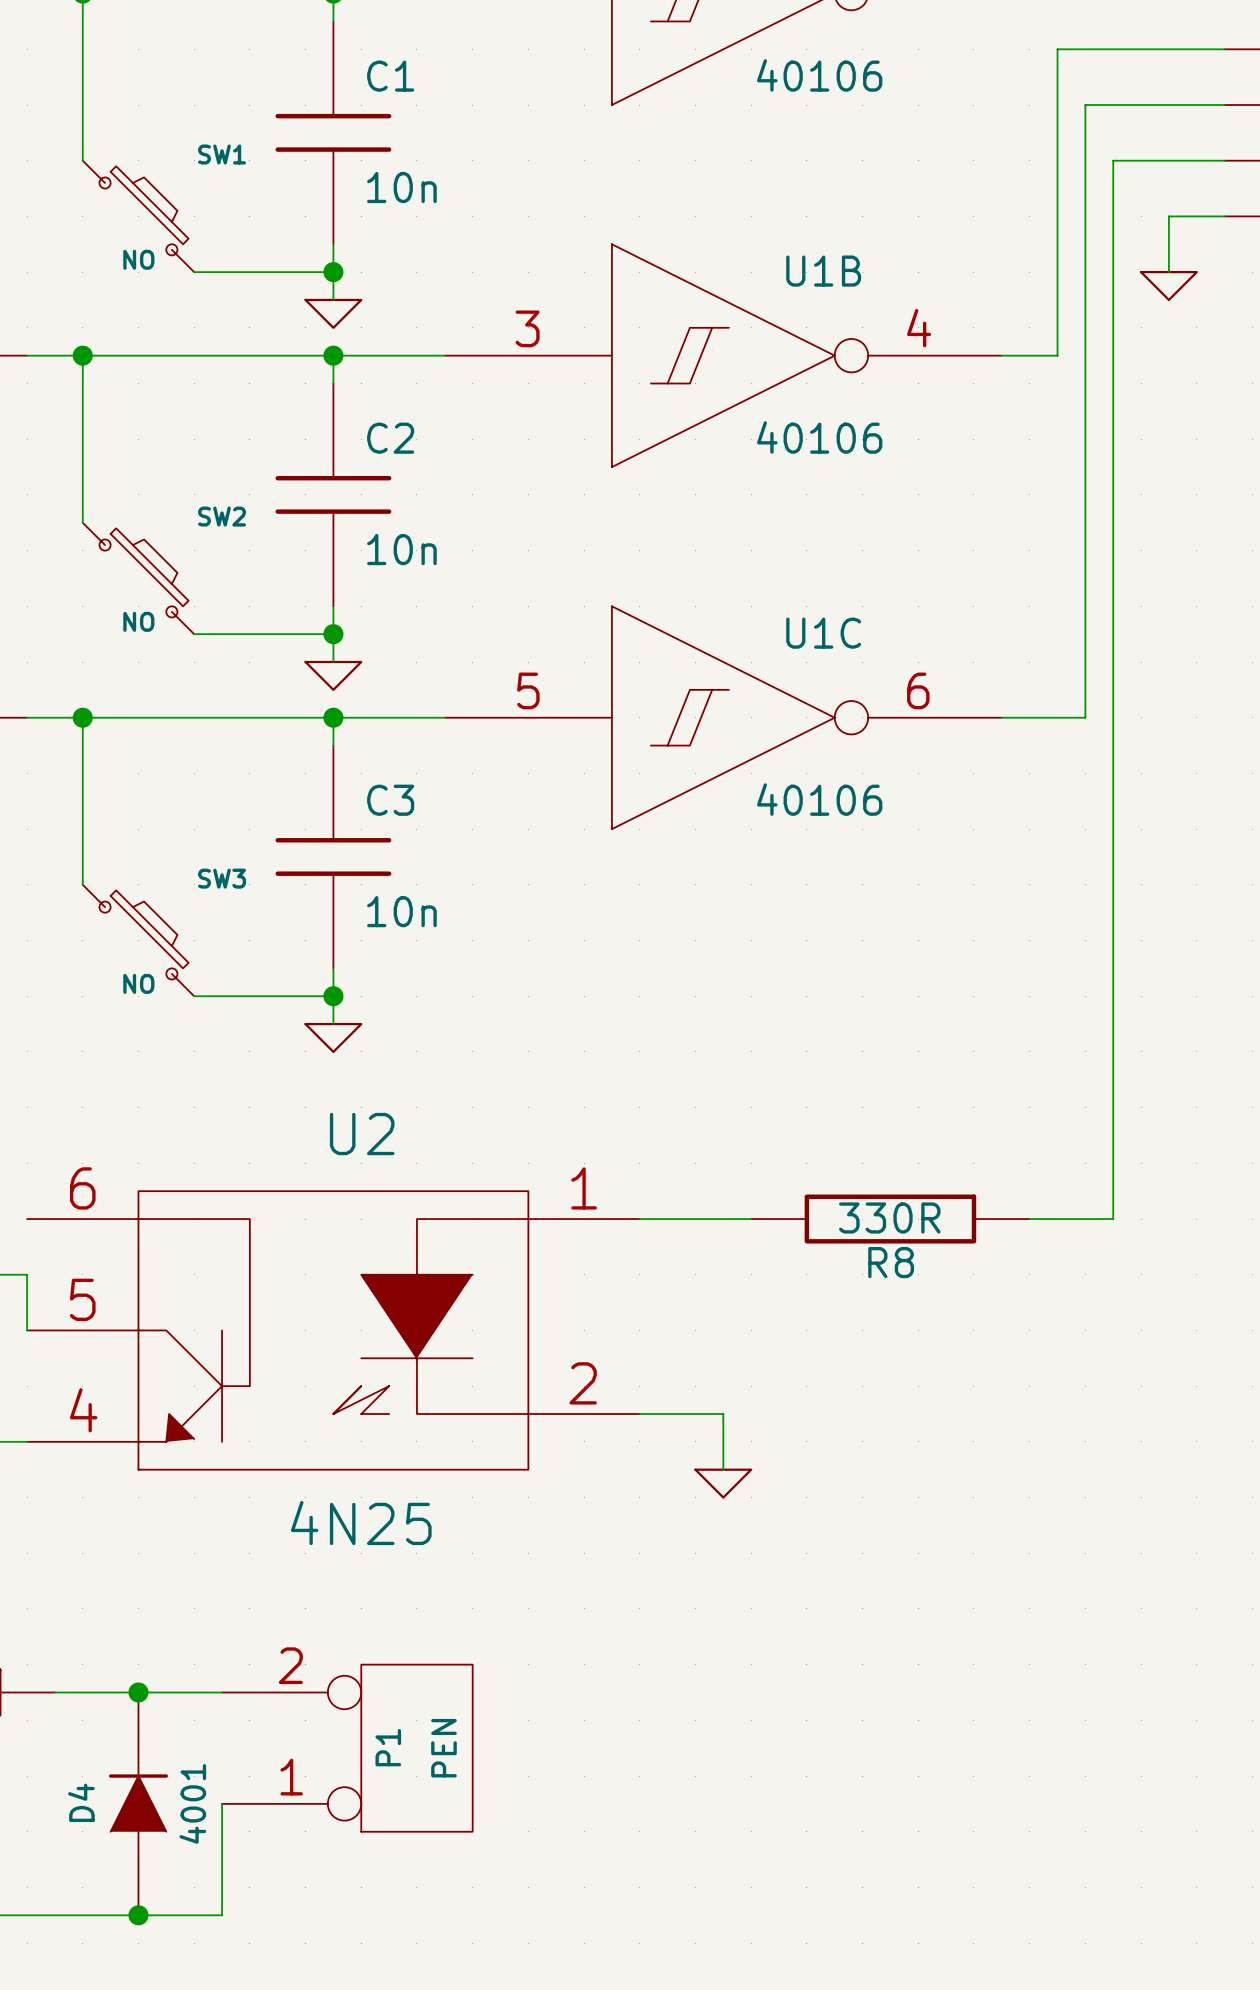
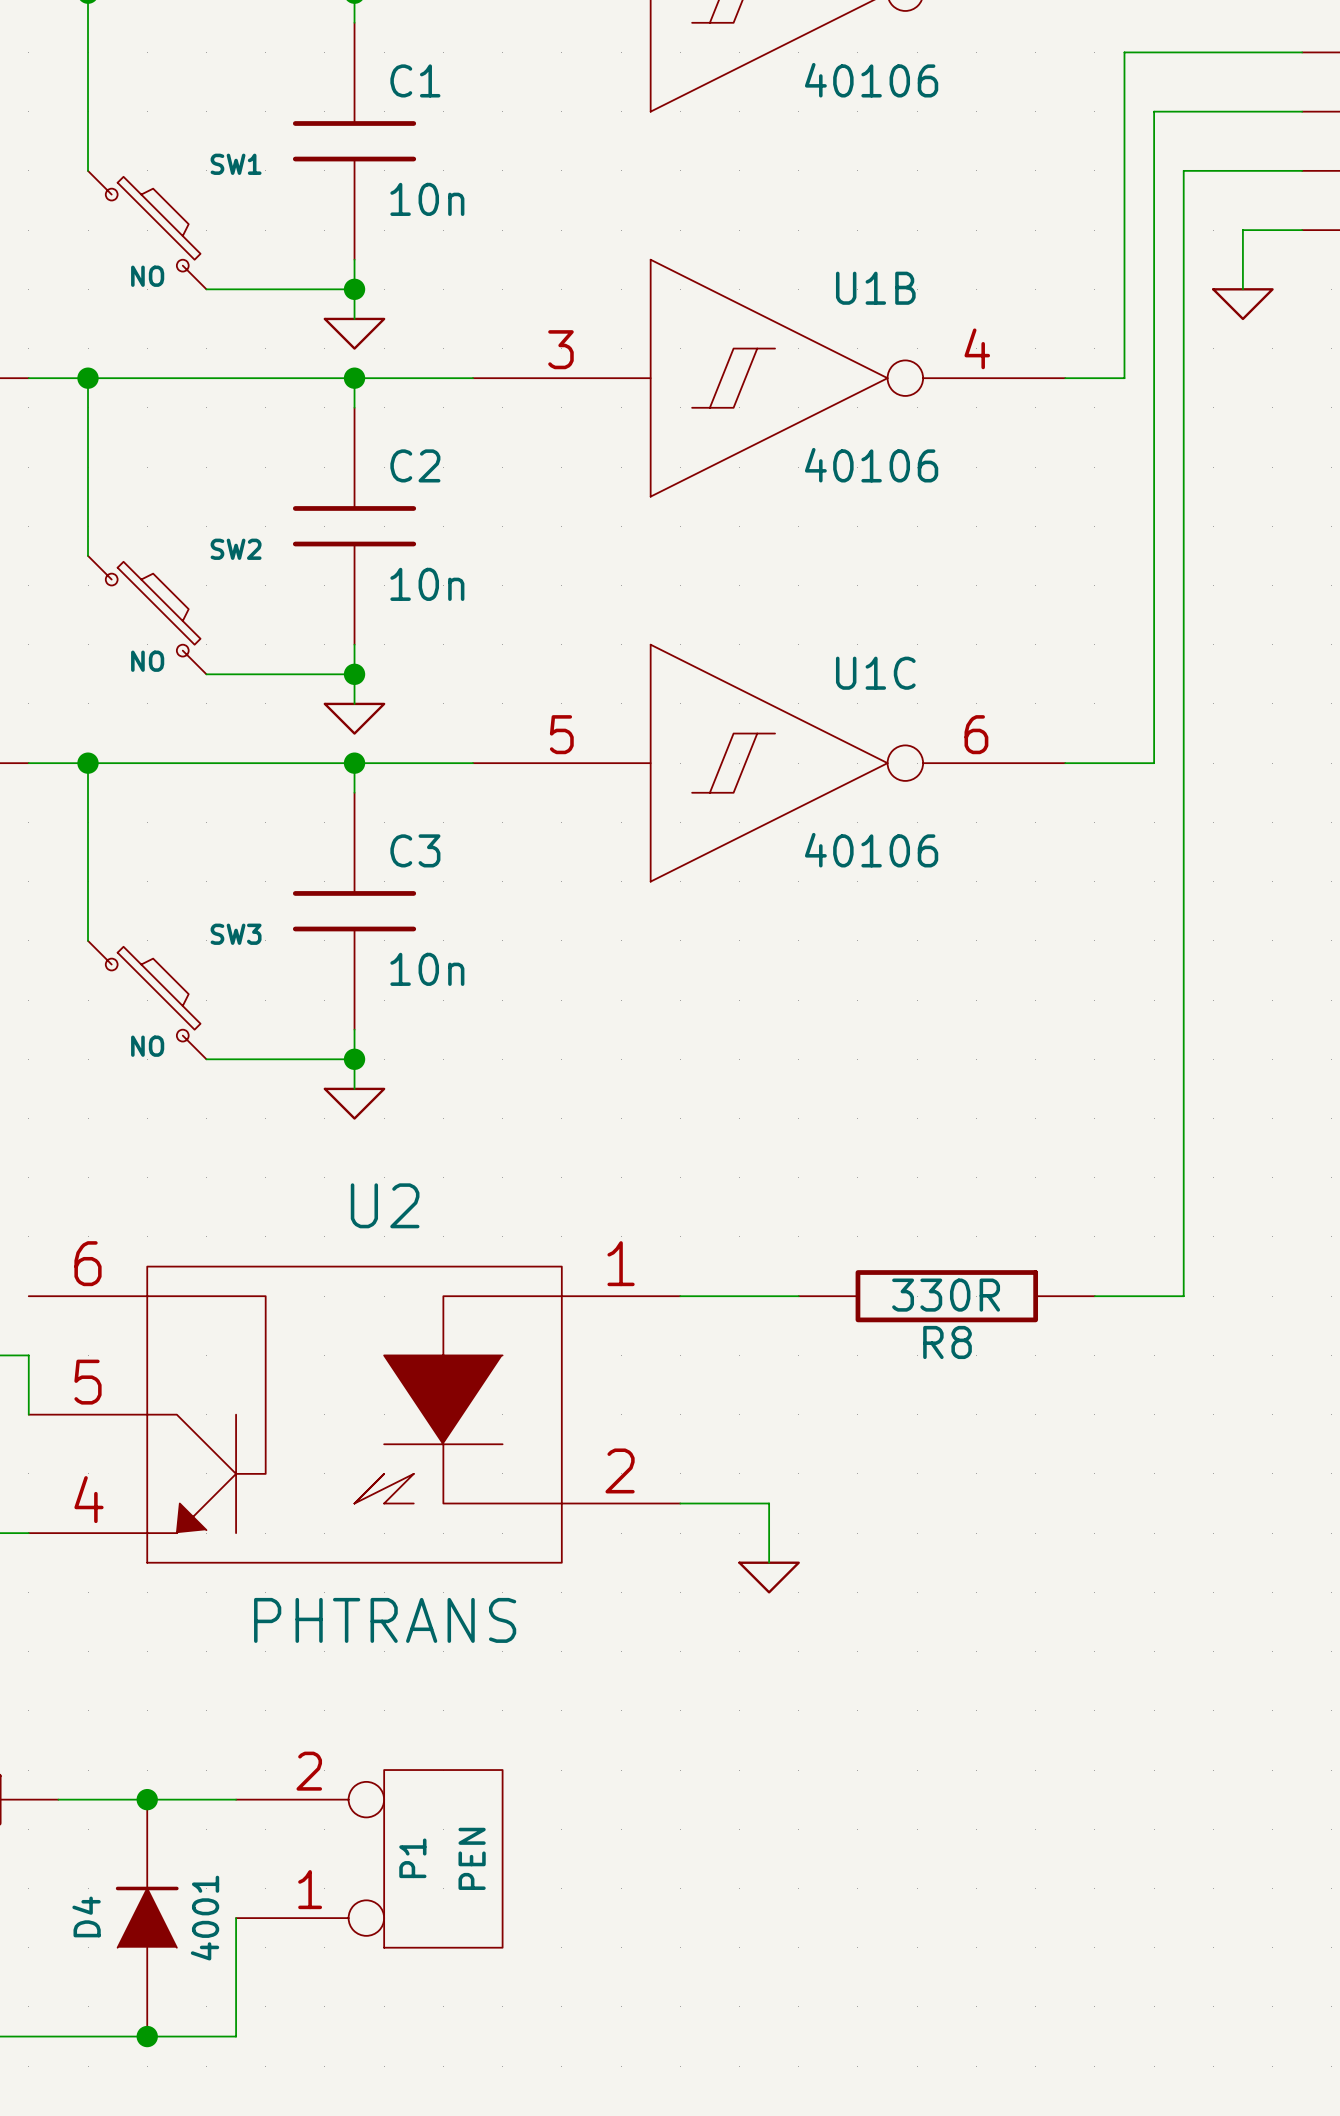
U2 value: 4N25 (361, 1523) -> PHTRANS (385, 1620)

